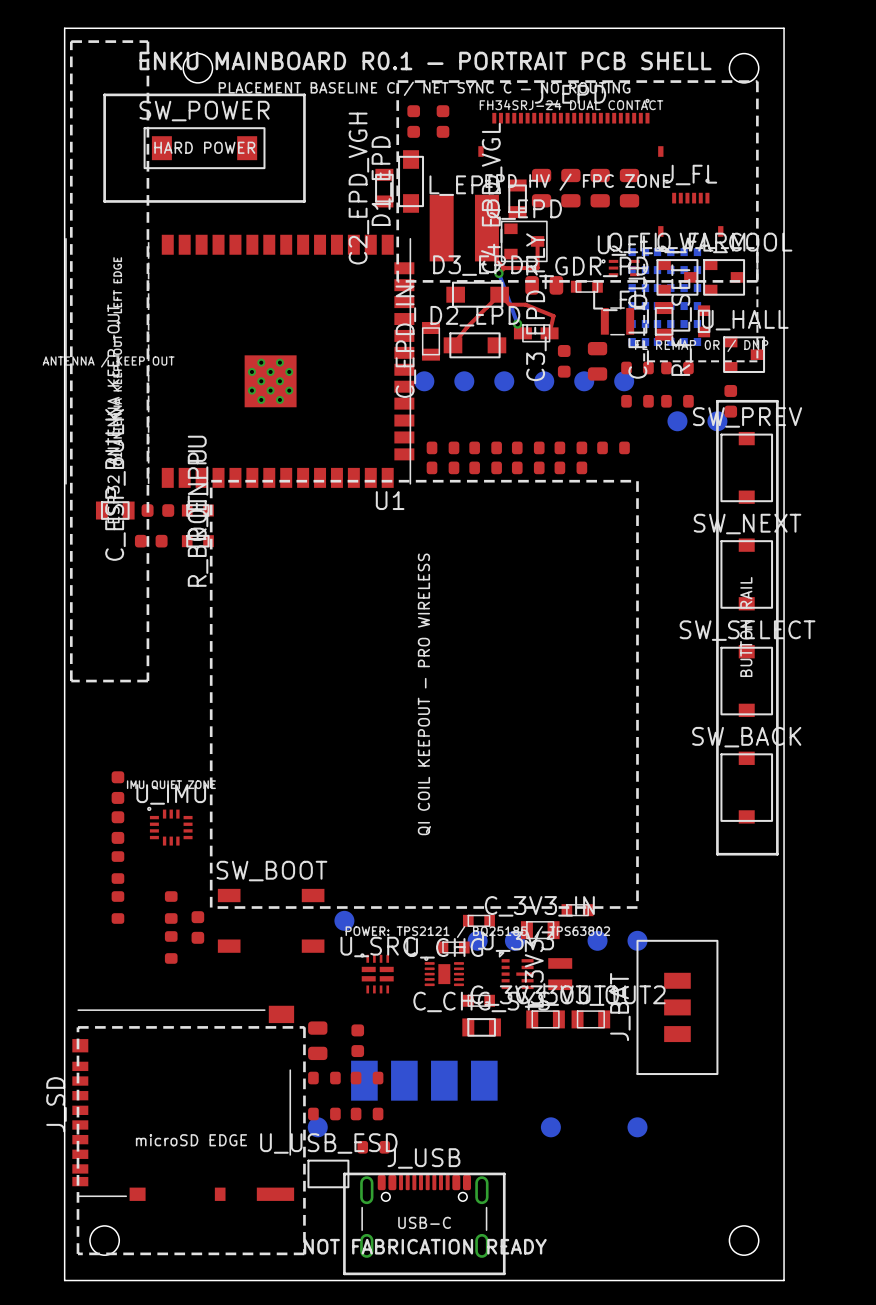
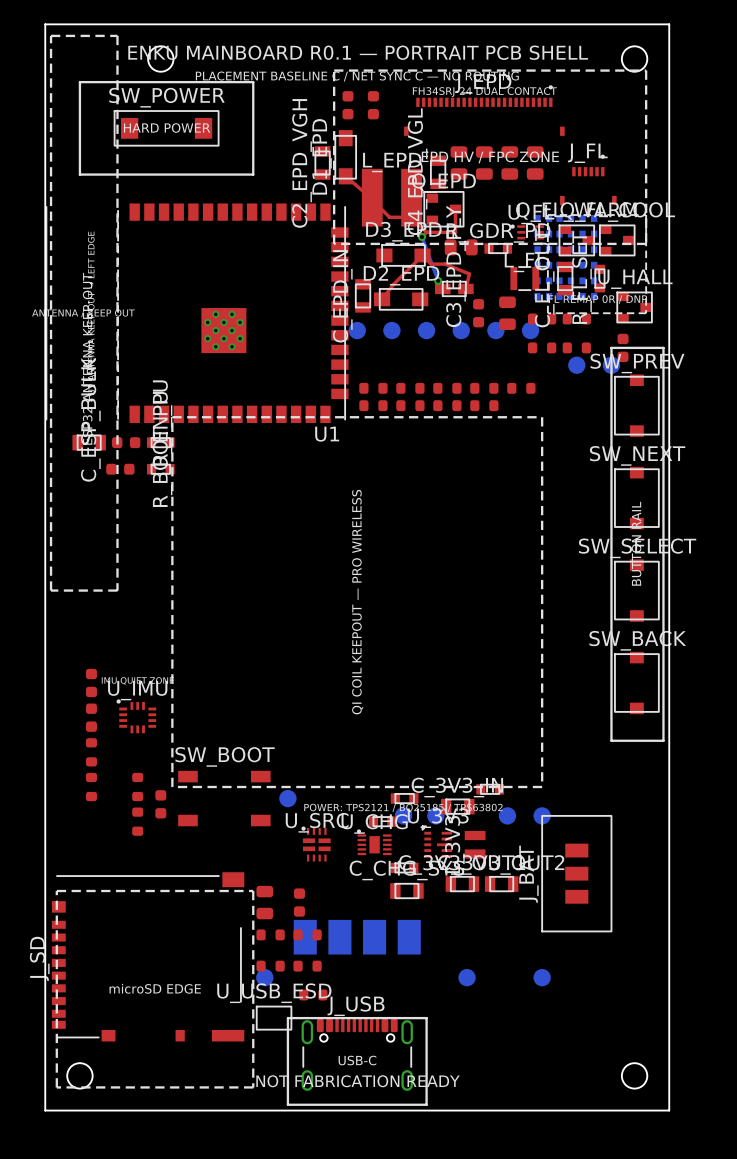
top track: none -> (345, 176) (389, 217) (411, 217)

